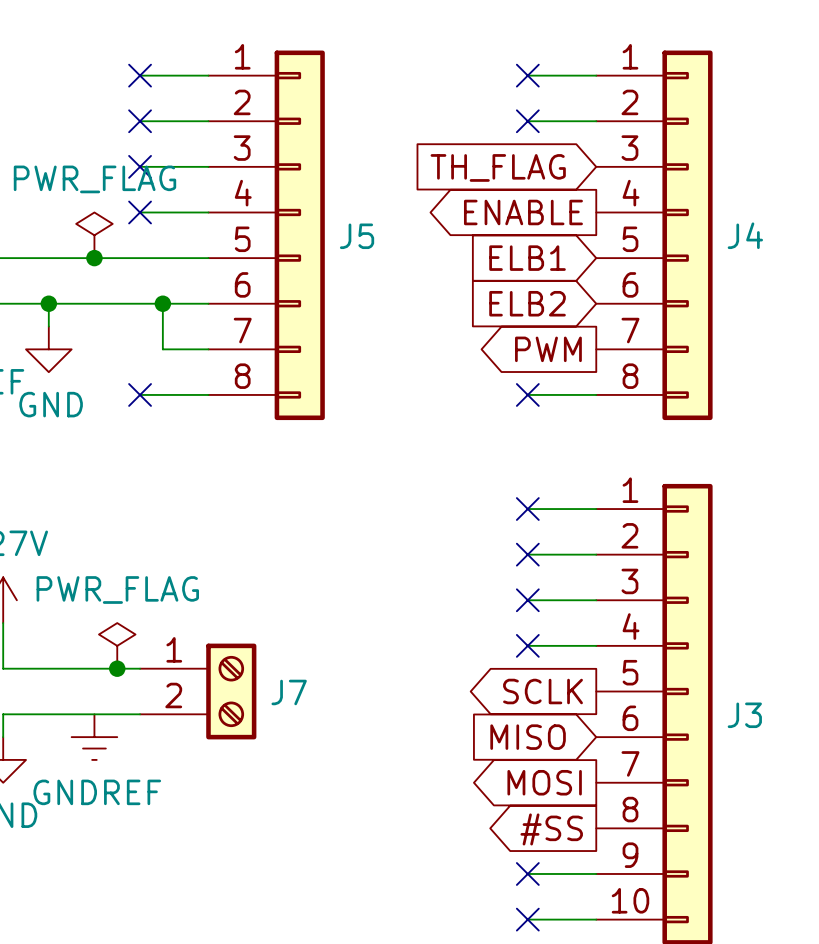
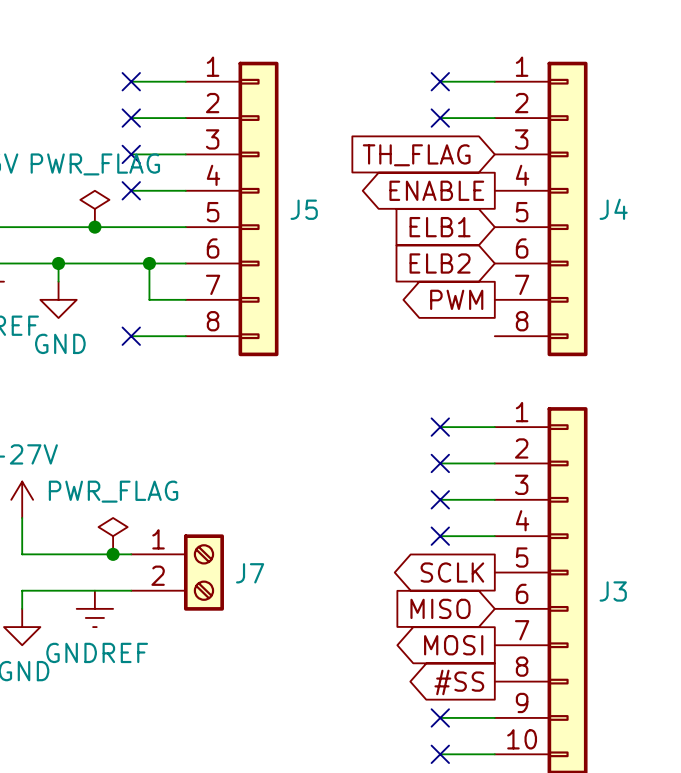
wire: (527, 394) (596, 394) -> none
no-connect mark: (527, 394) -> none

